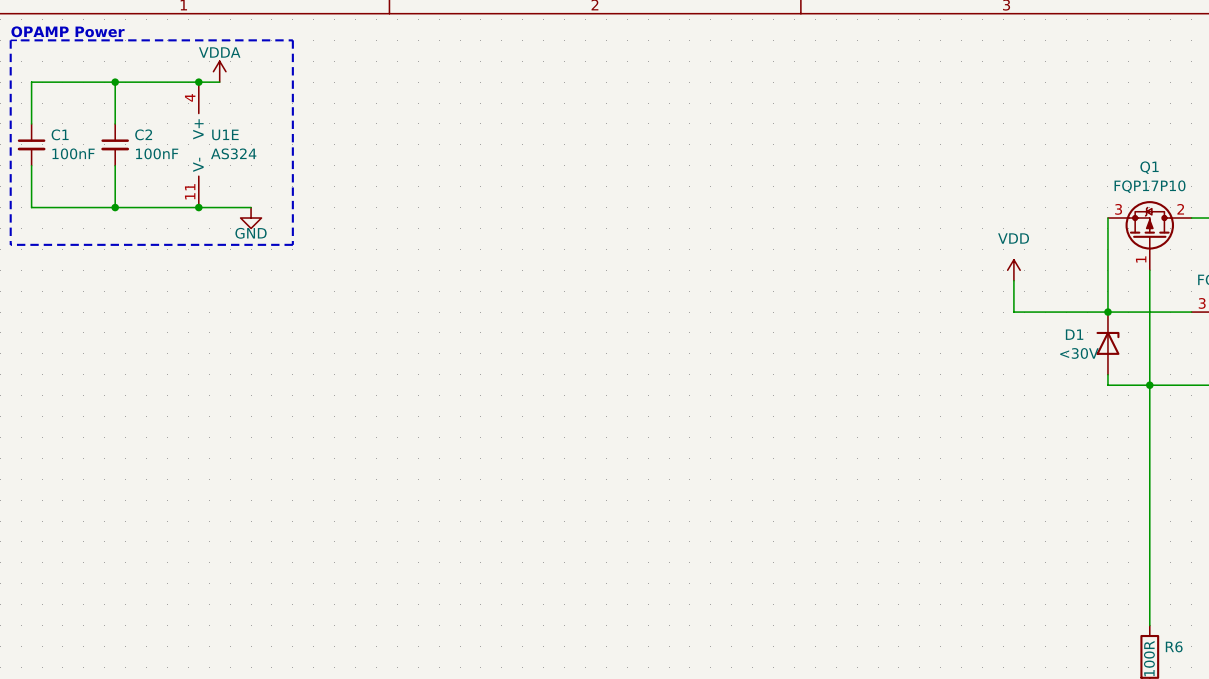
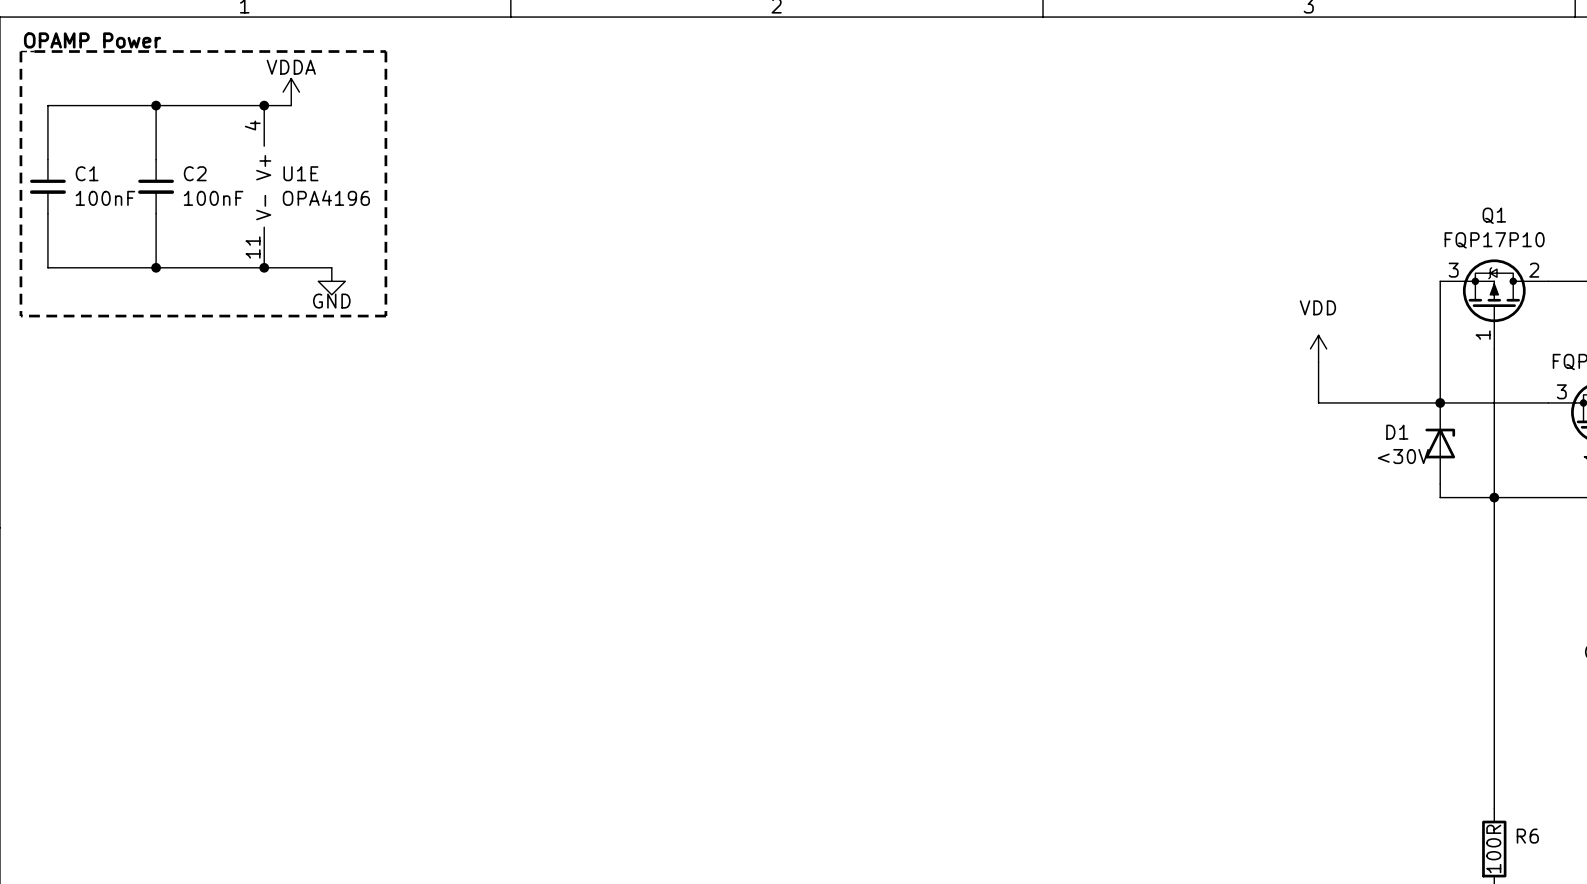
U1E value: AS324 (233, 153) -> OPA4196 (326, 198)

